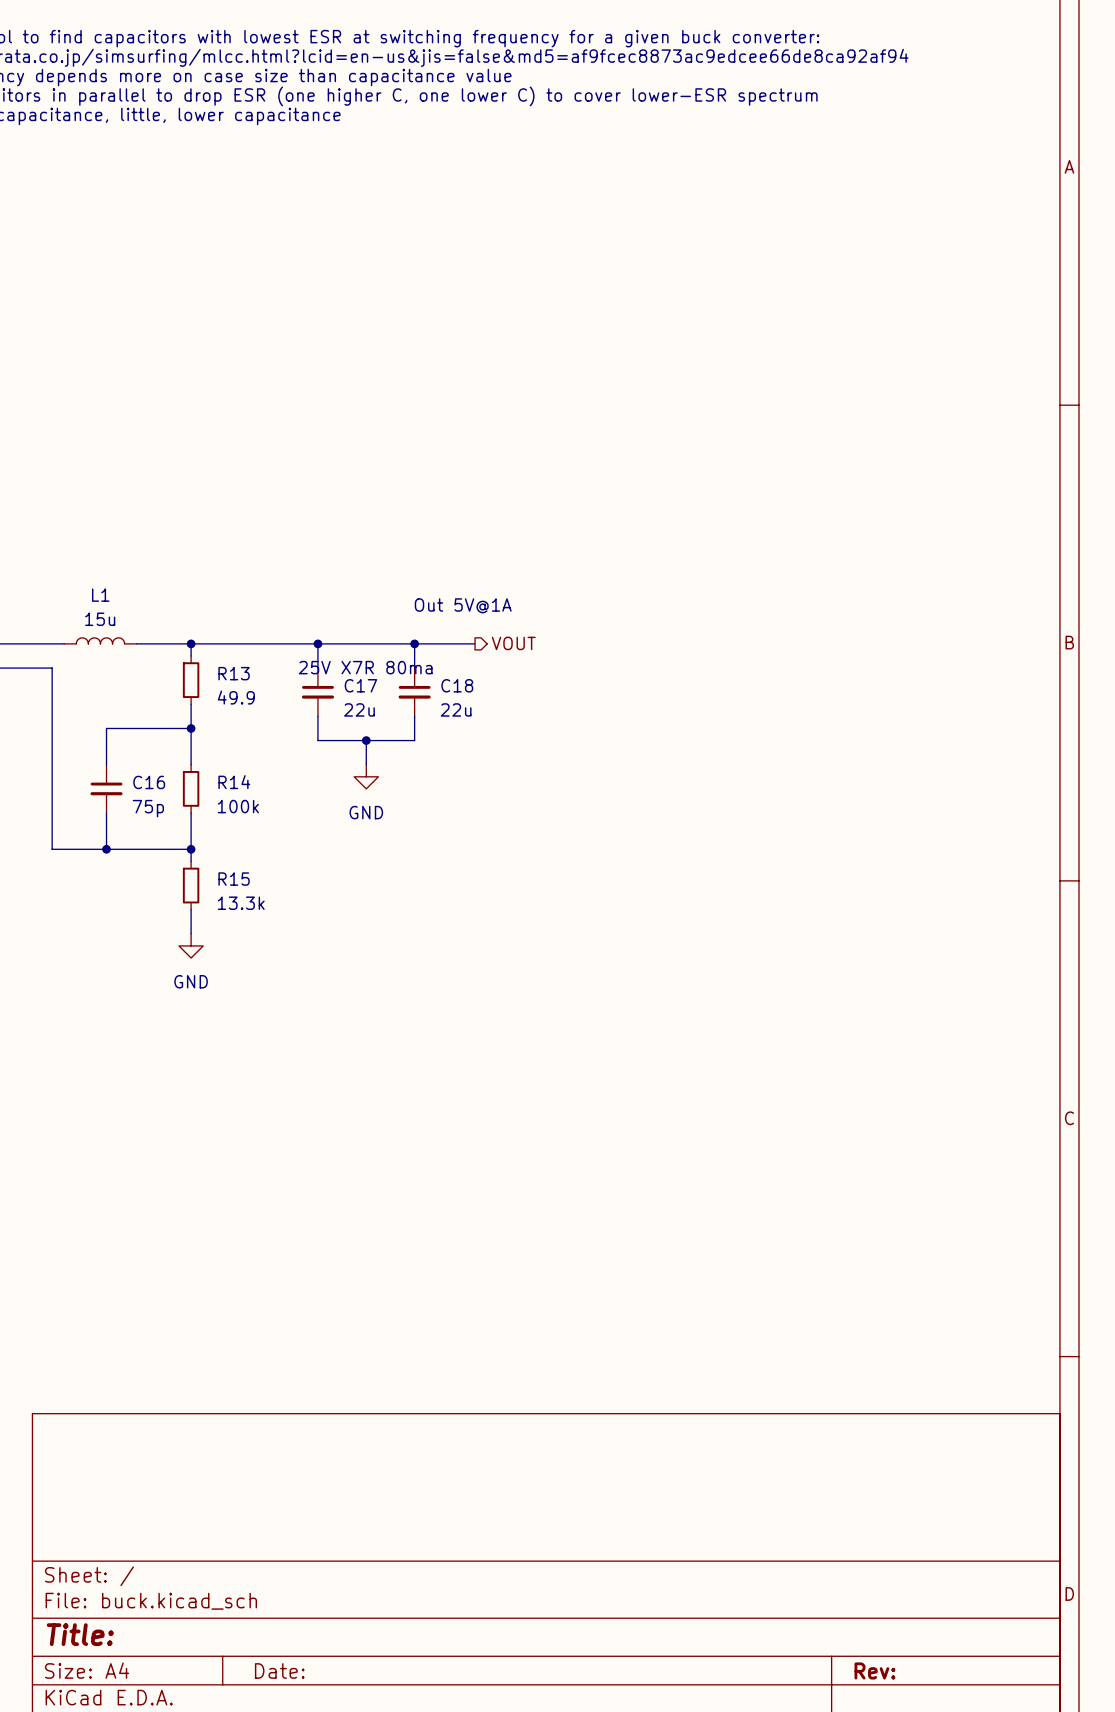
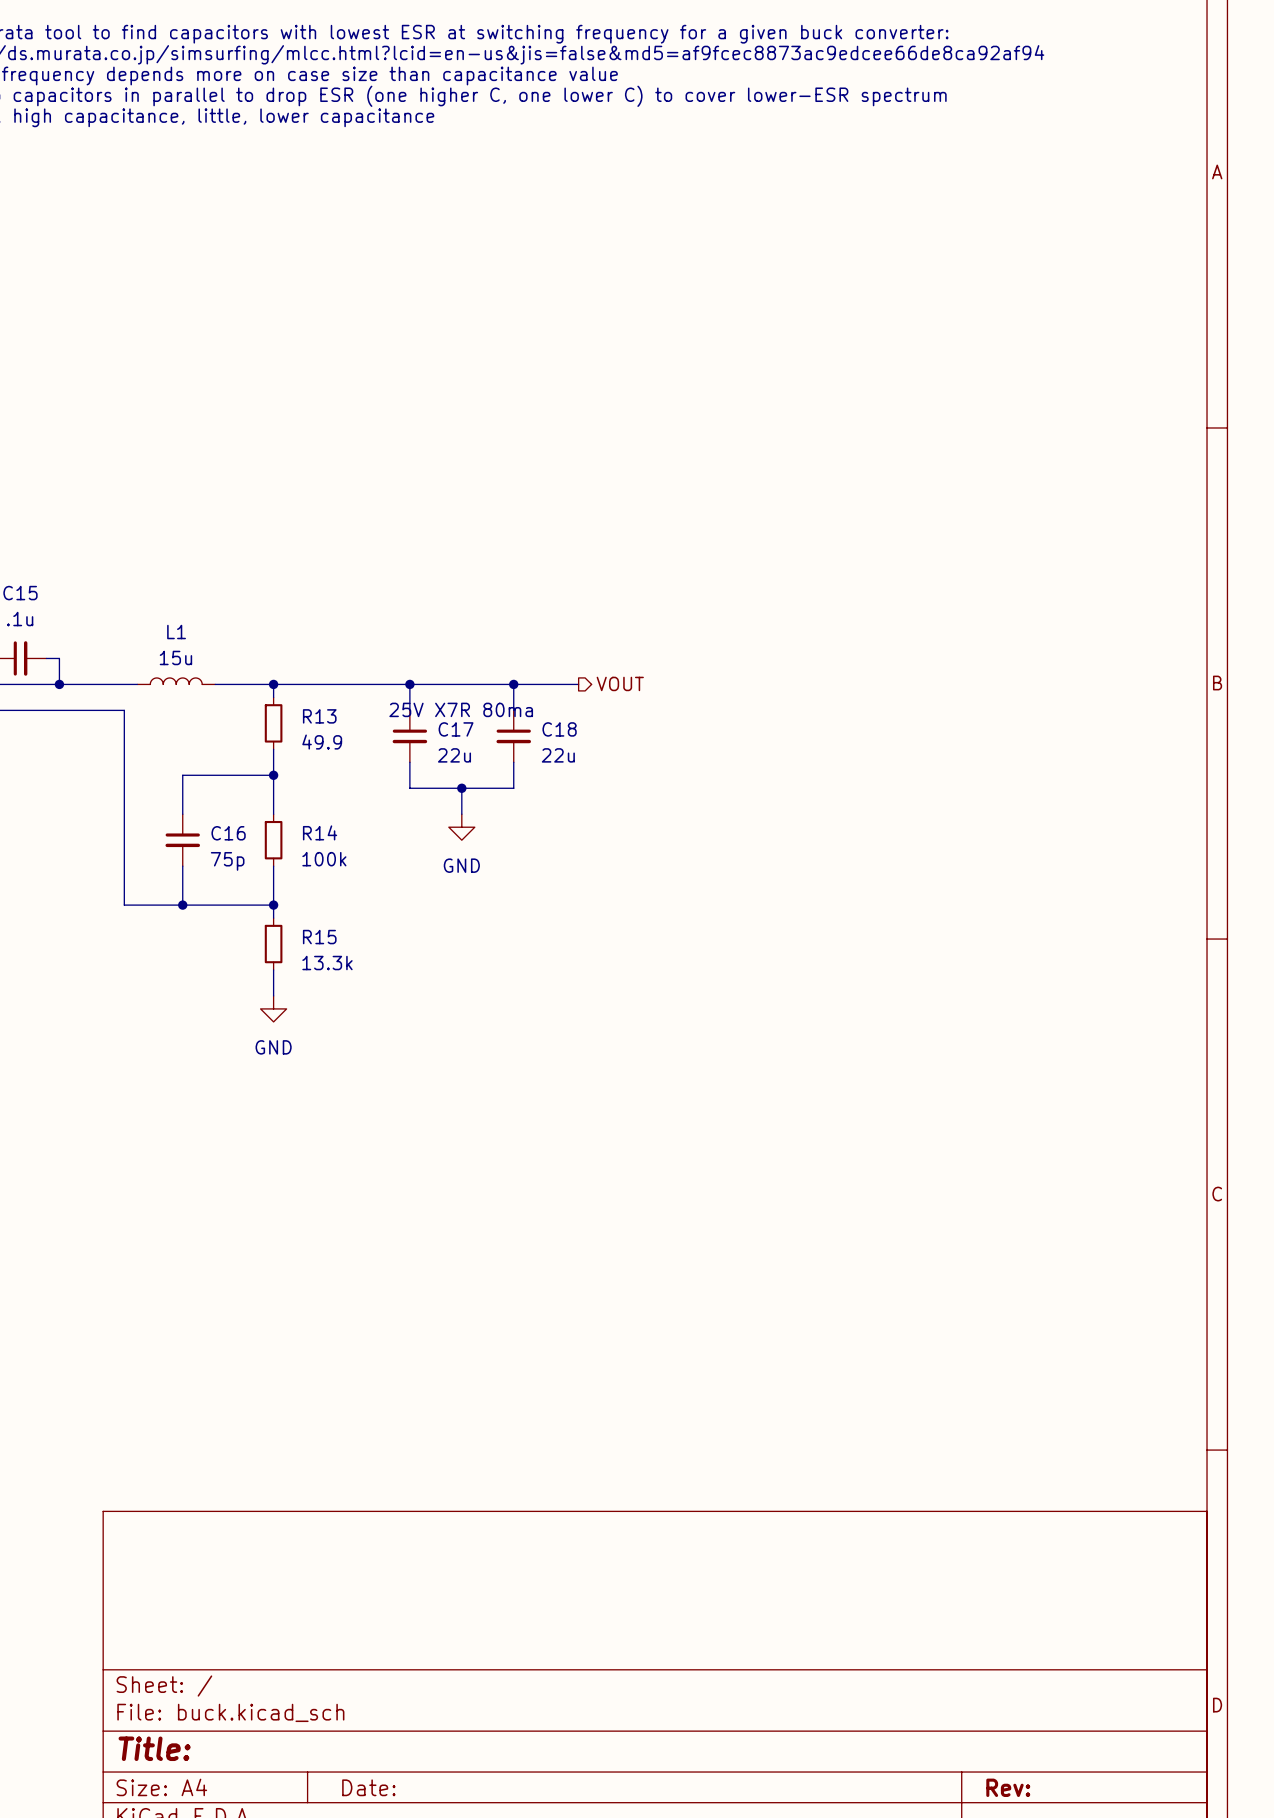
text: Out 5V@1A (463, 605) -> none

